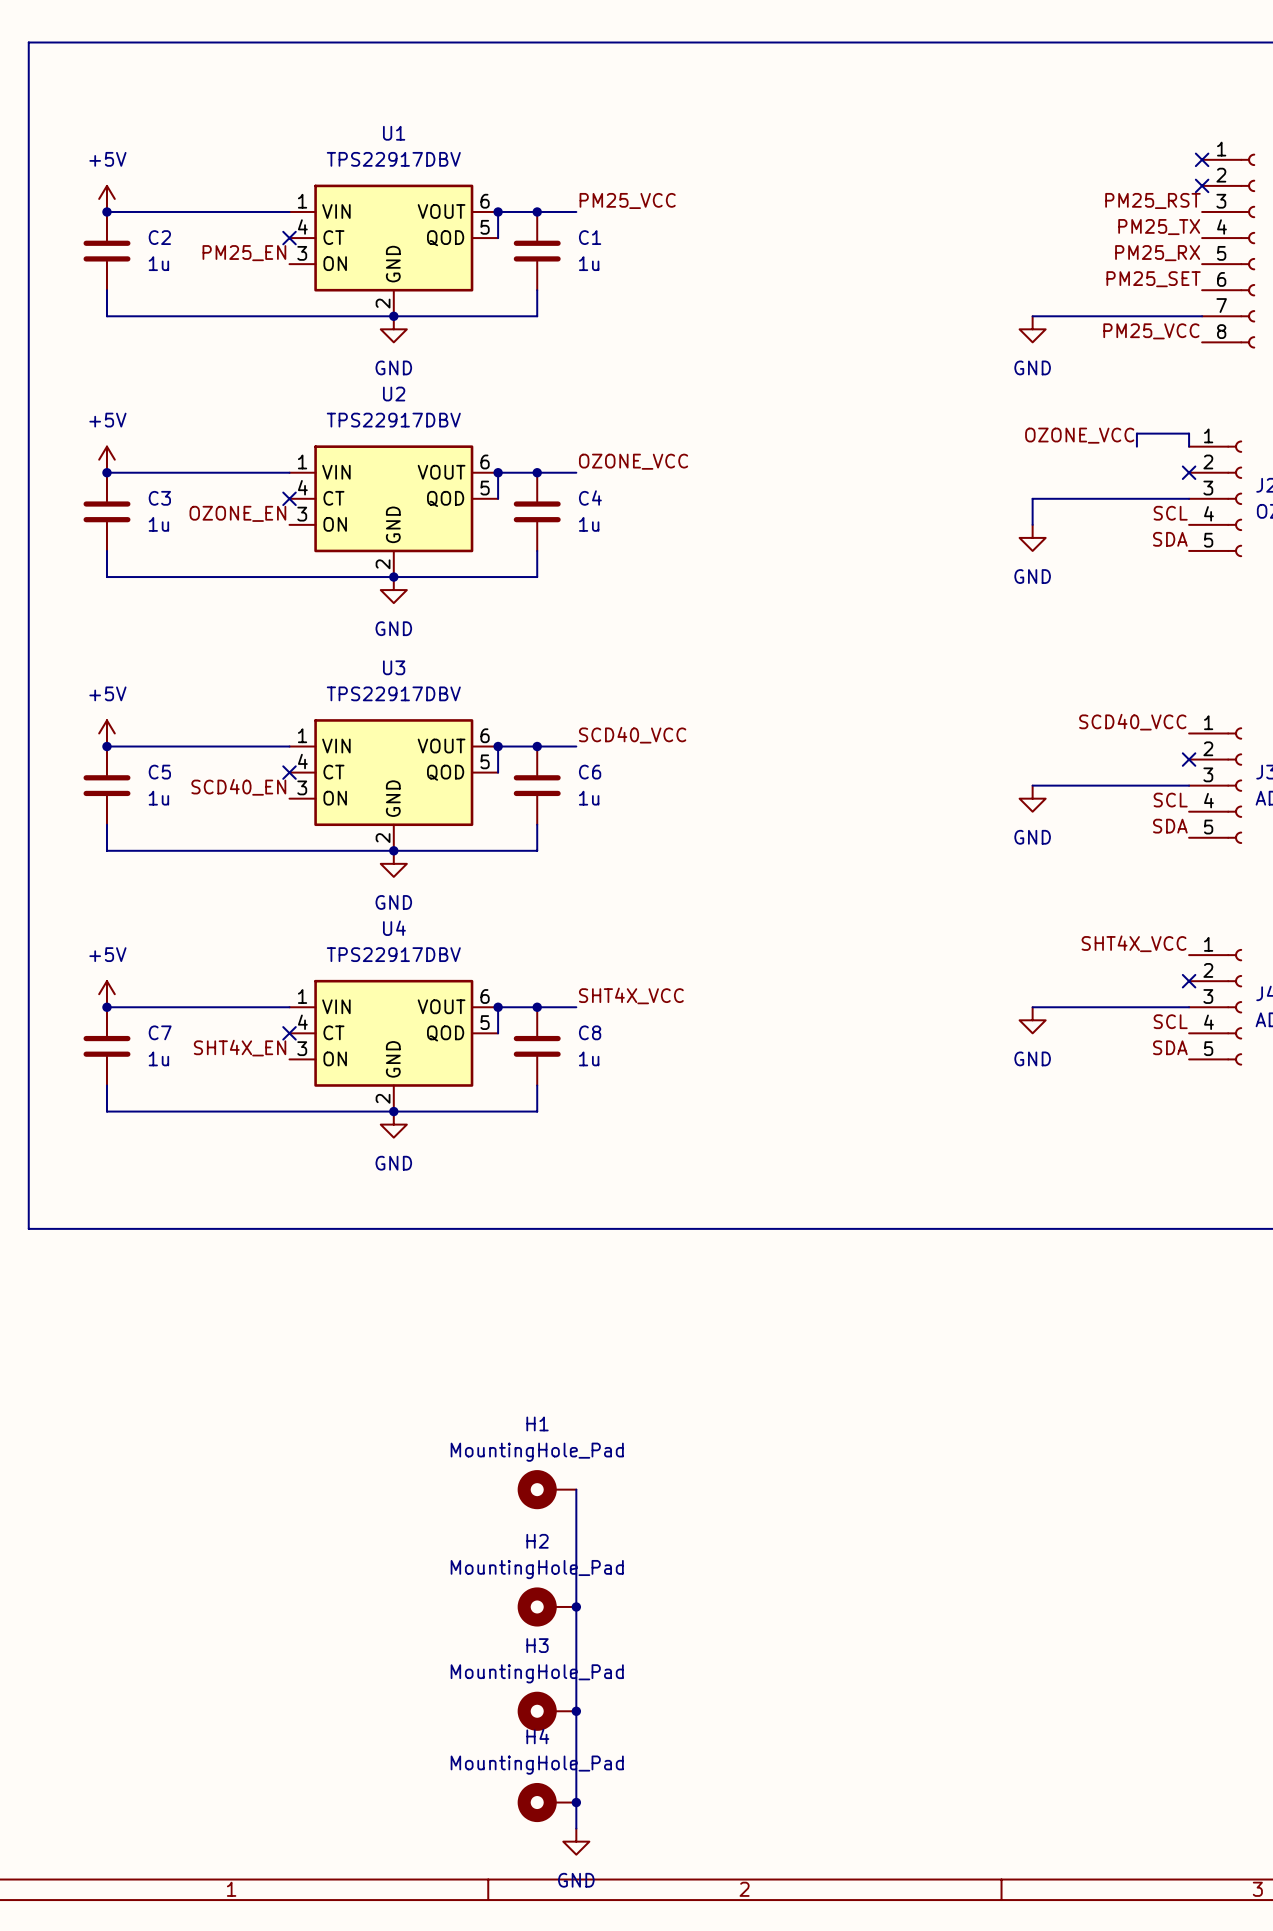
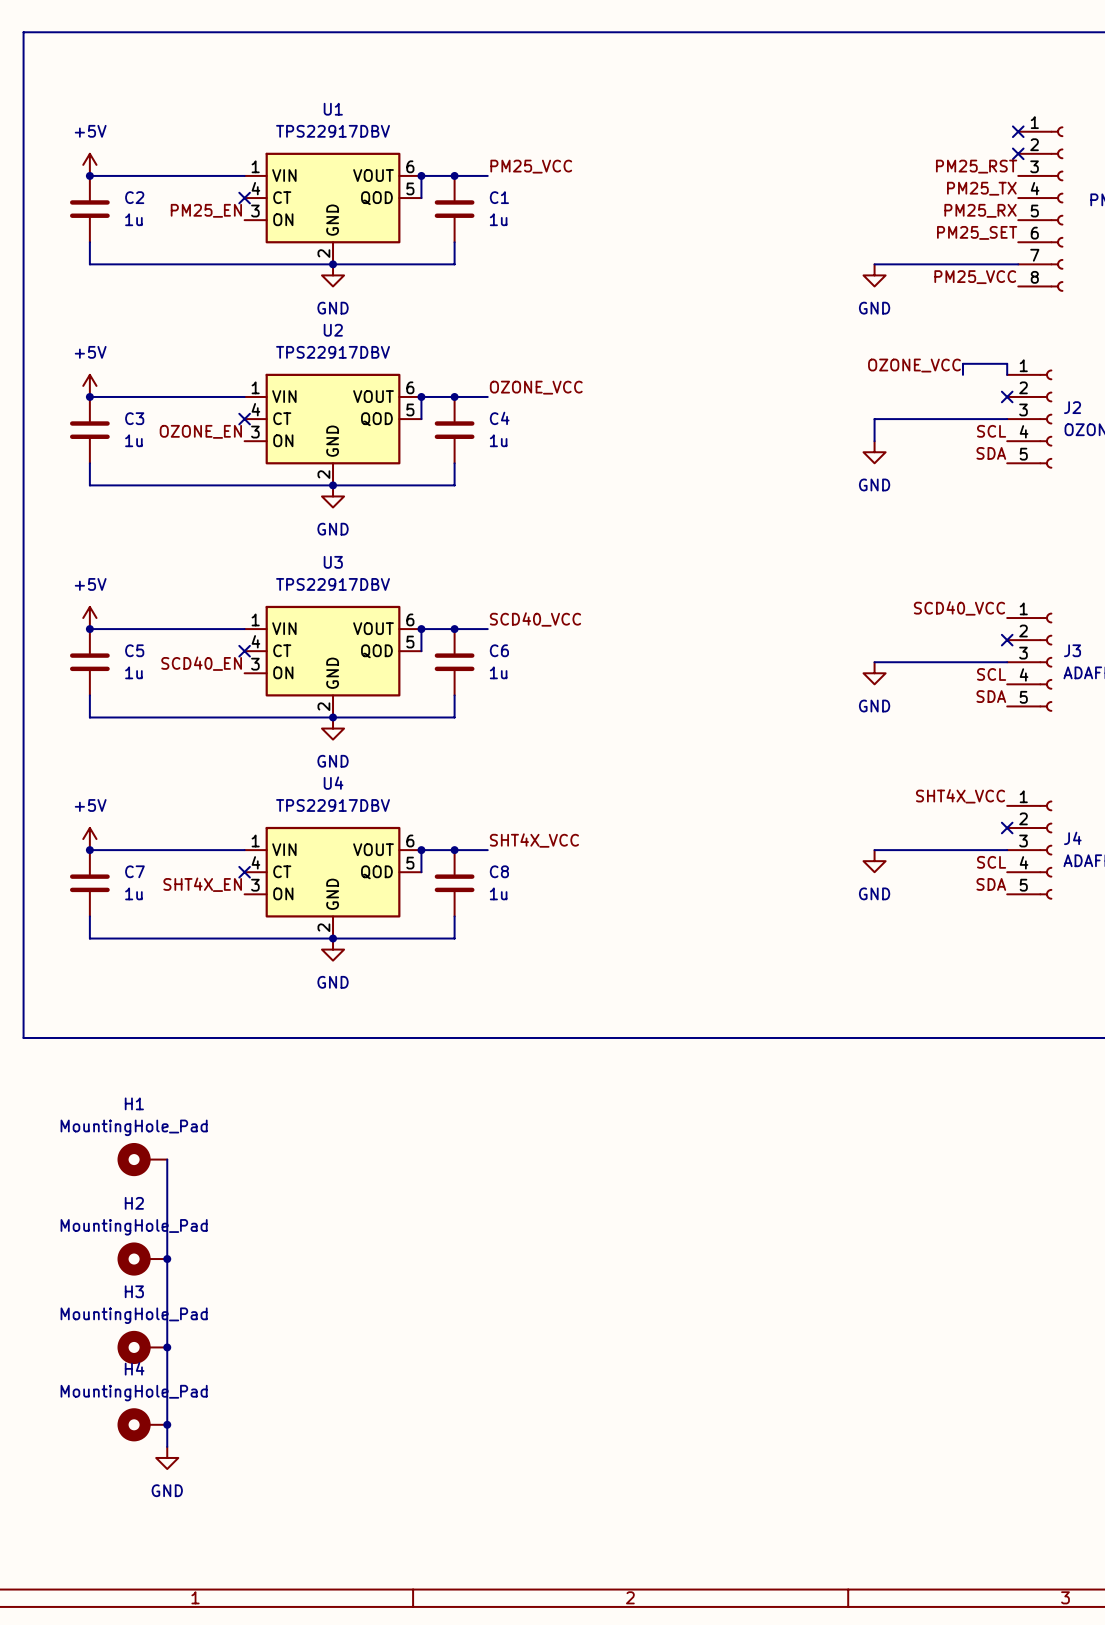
wire: none -> (167, 1159) (167, 1446)
junction: none -> (167, 1259)
H1 position: (546, 1489) -> (142, 1159)
wire: (576, 1489) (576, 1828) -> none
junction: none -> (167, 1347)
H2 position: (546, 1606) -> (142, 1259)
junction: (576, 1606) -> none
junction: none -> (167, 1424)
H3 position: (546, 1711) -> (142, 1347)
junction: (576, 1711) -> none
power symbol: none -> GND (167, 1457)
H4 position: (546, 1802) -> (142, 1424)
junction: (576, 1802) -> none
power symbol: GND (576, 1841) -> none

